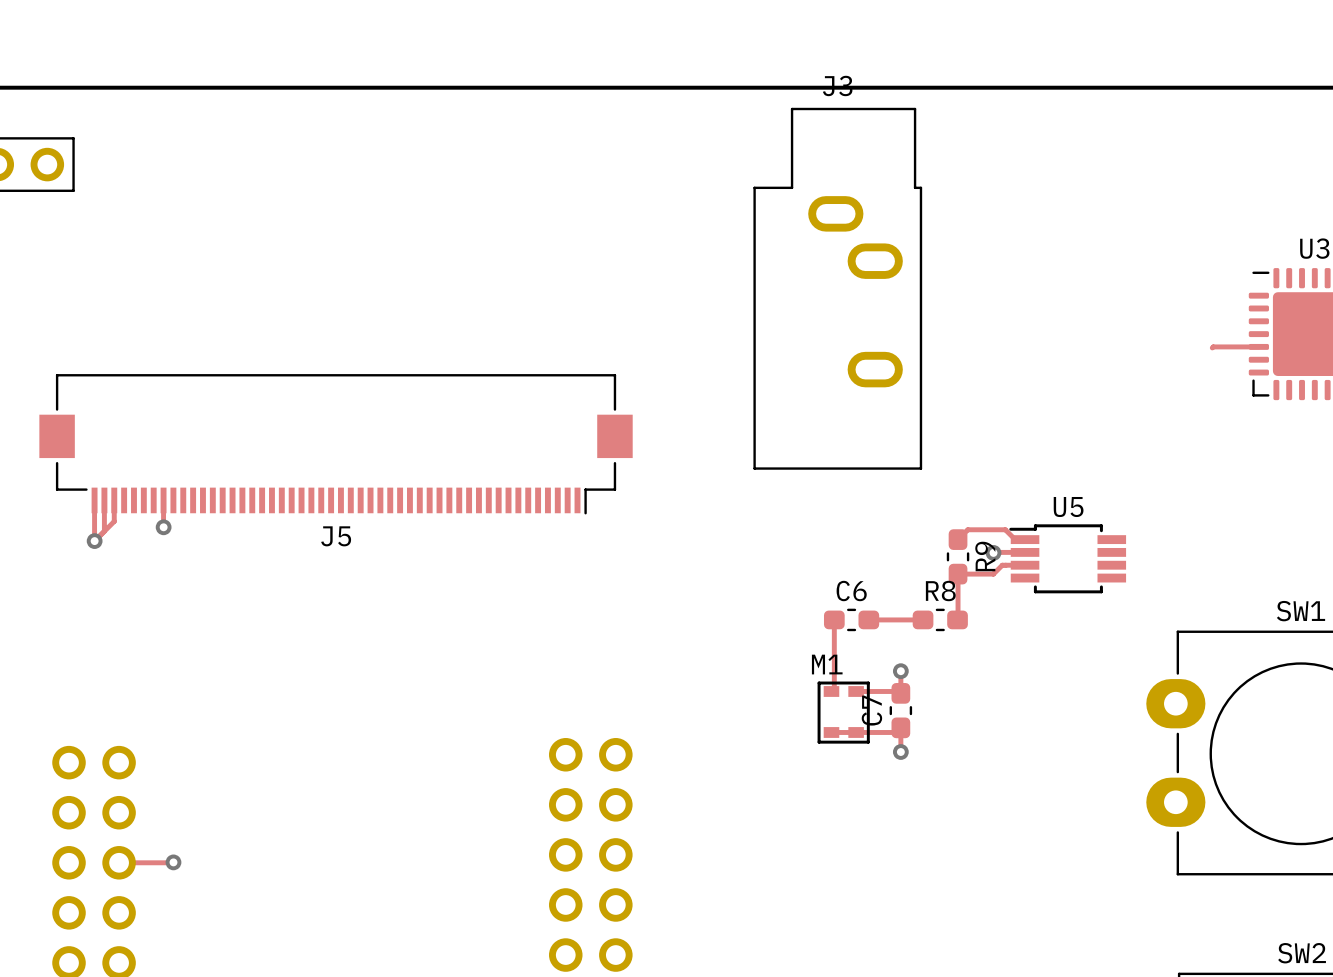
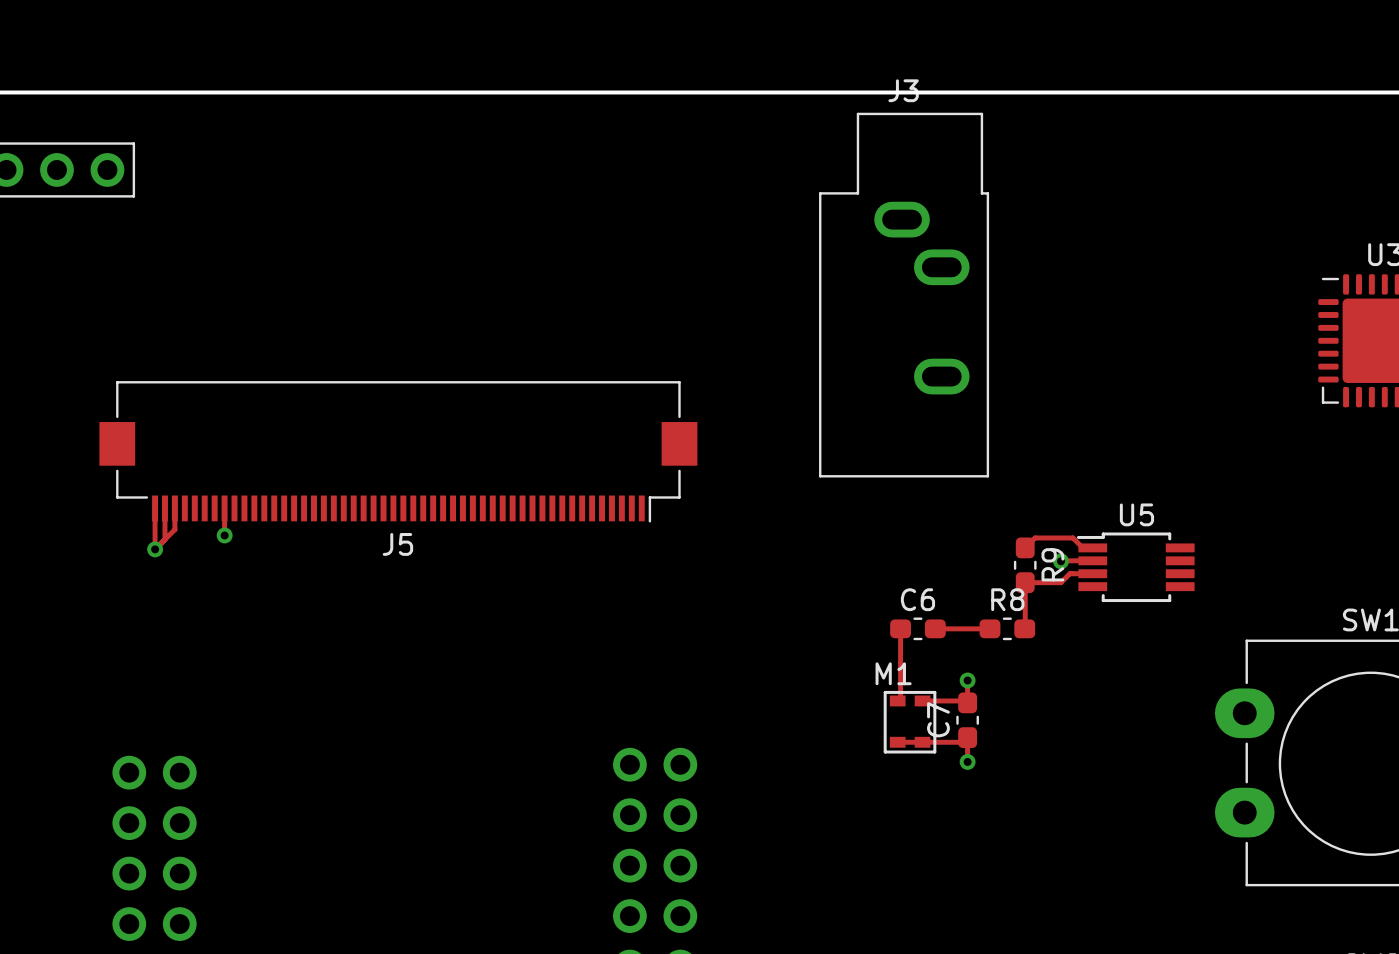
top track: (1258, 346) (1212, 347) -> none
top track: (173, 862) (119, 862) -> none
via: (173, 862) -> none

